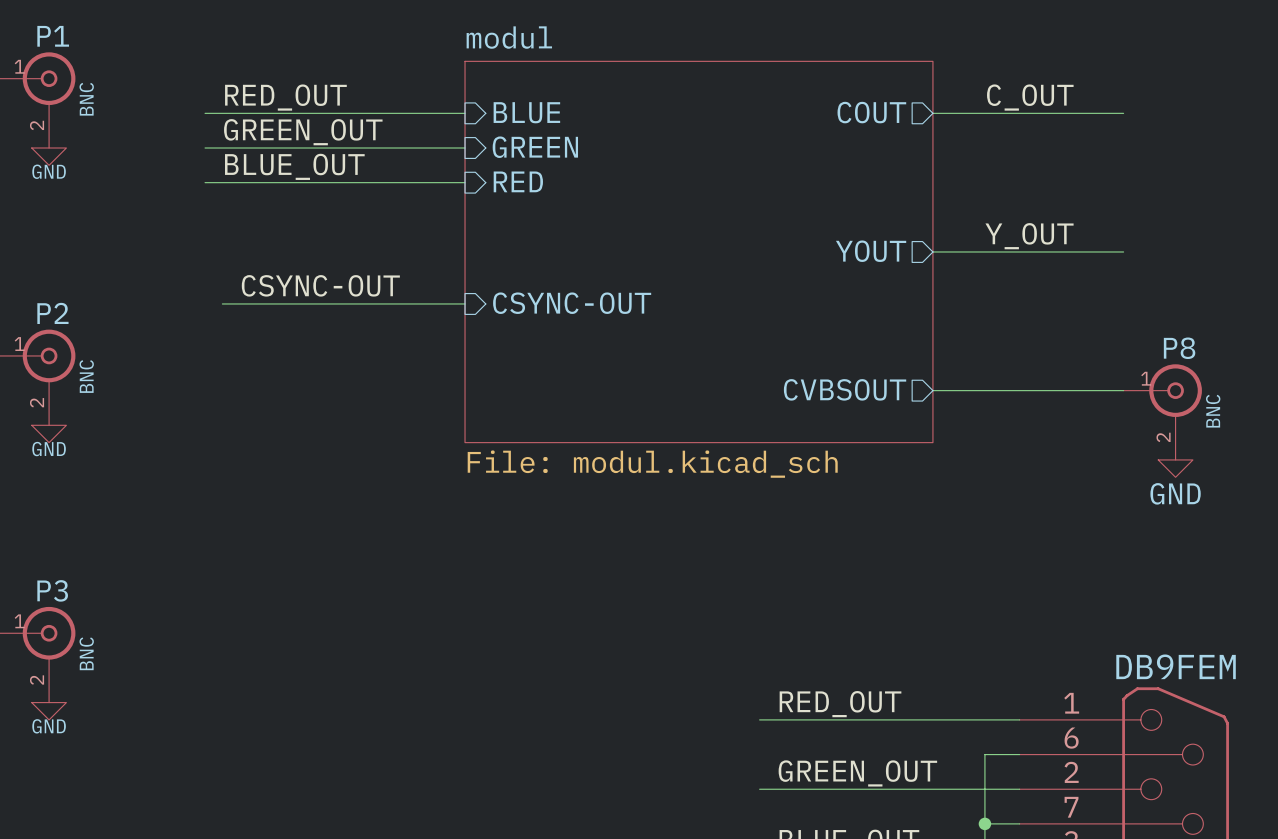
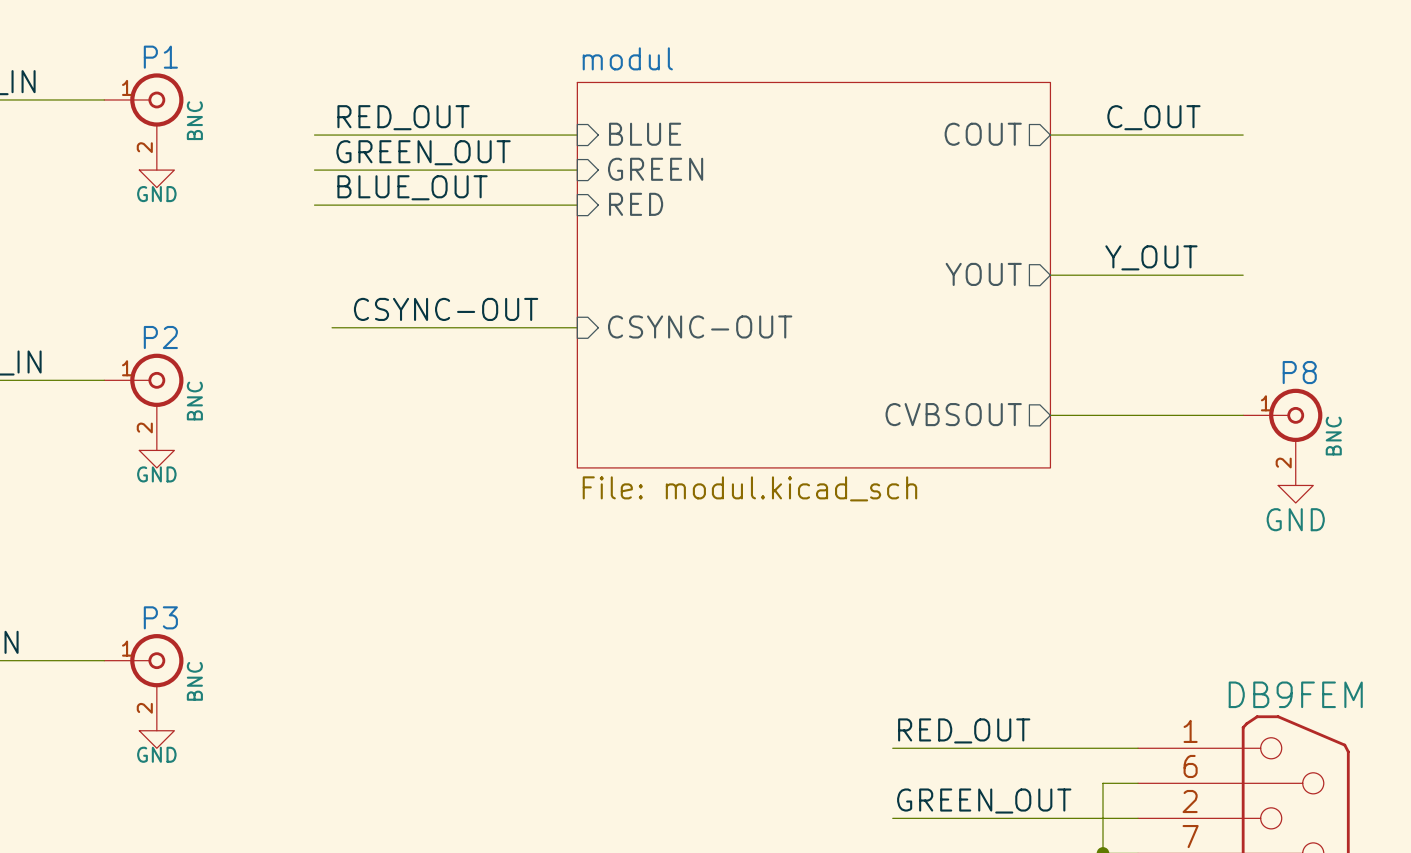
wire: (759, 719) (776, 719) -> none
wire: (759, 789) (776, 789) -> none

